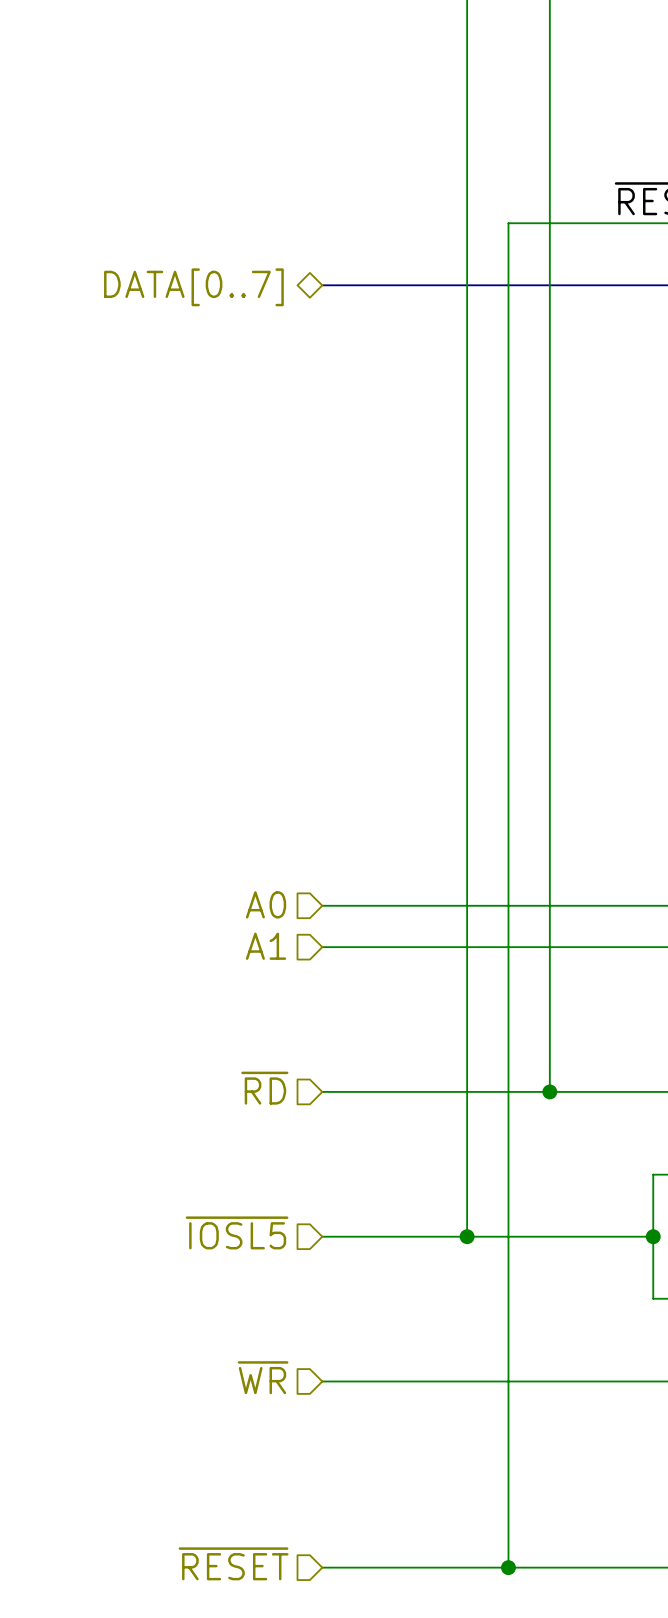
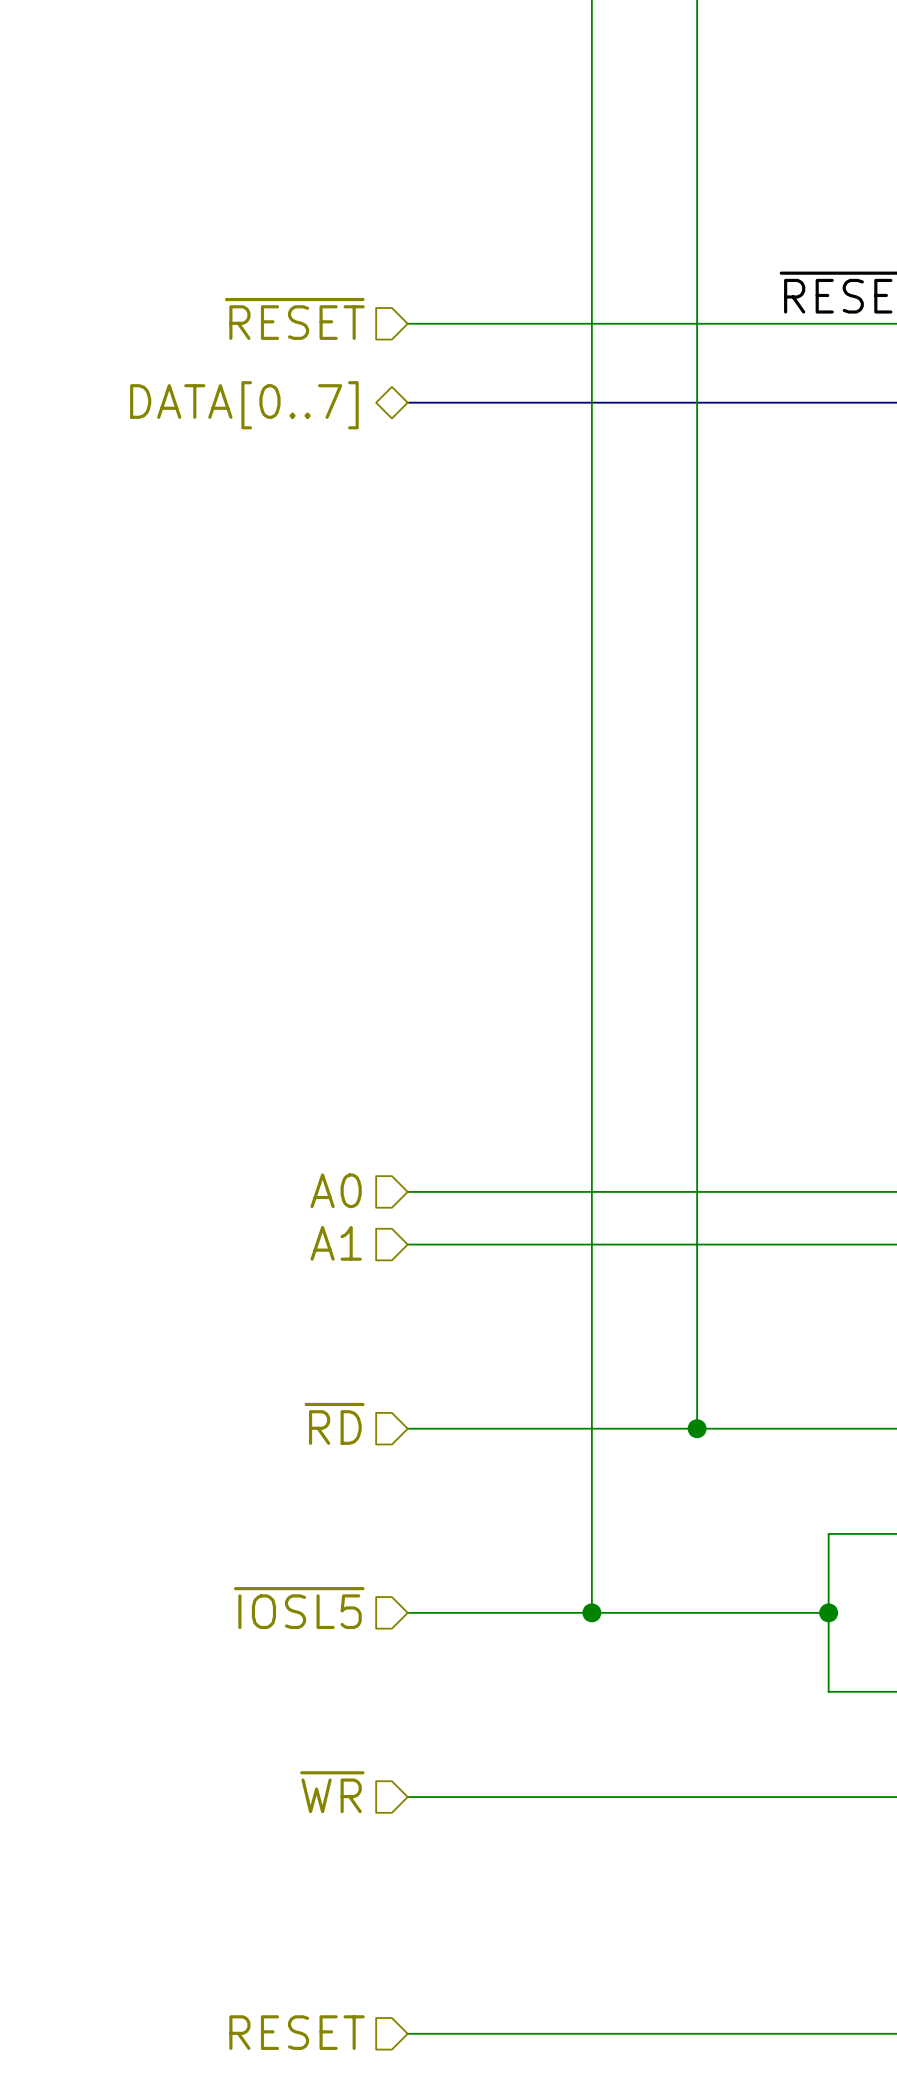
hierarchical label: none -> ~{RESET} (294, 318)
wire: (508, 223) (508, 1567) -> (644, 323) (407, 323)
hierarchical label: ~{RESET} (233, 1563) -> RESET (297, 2032)
junction: (508, 1567) -> none

